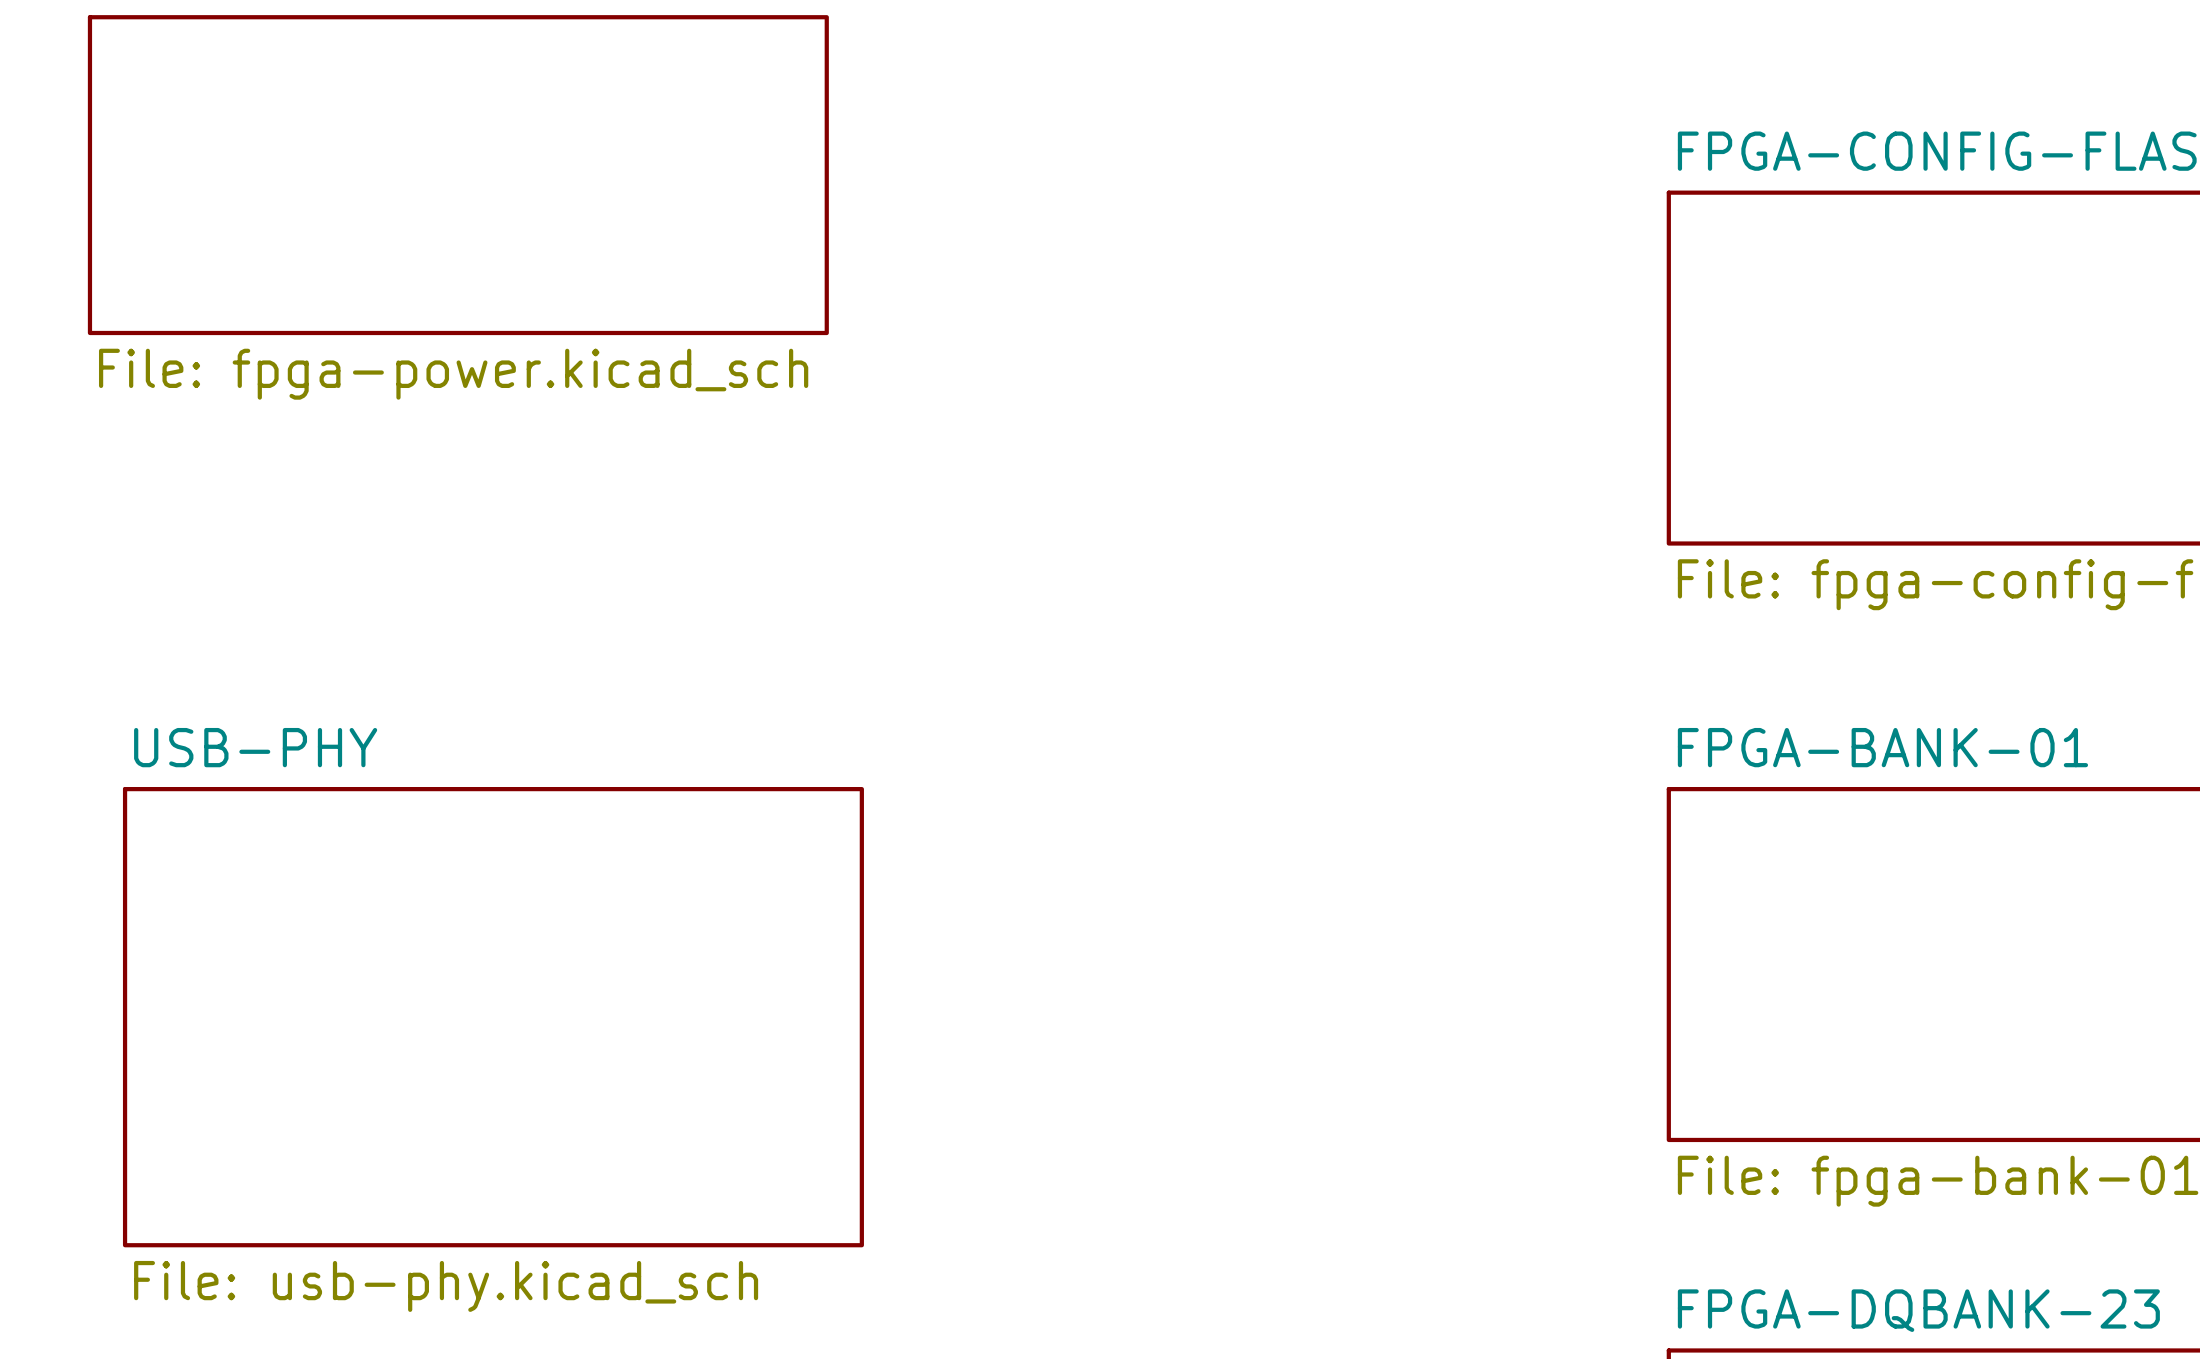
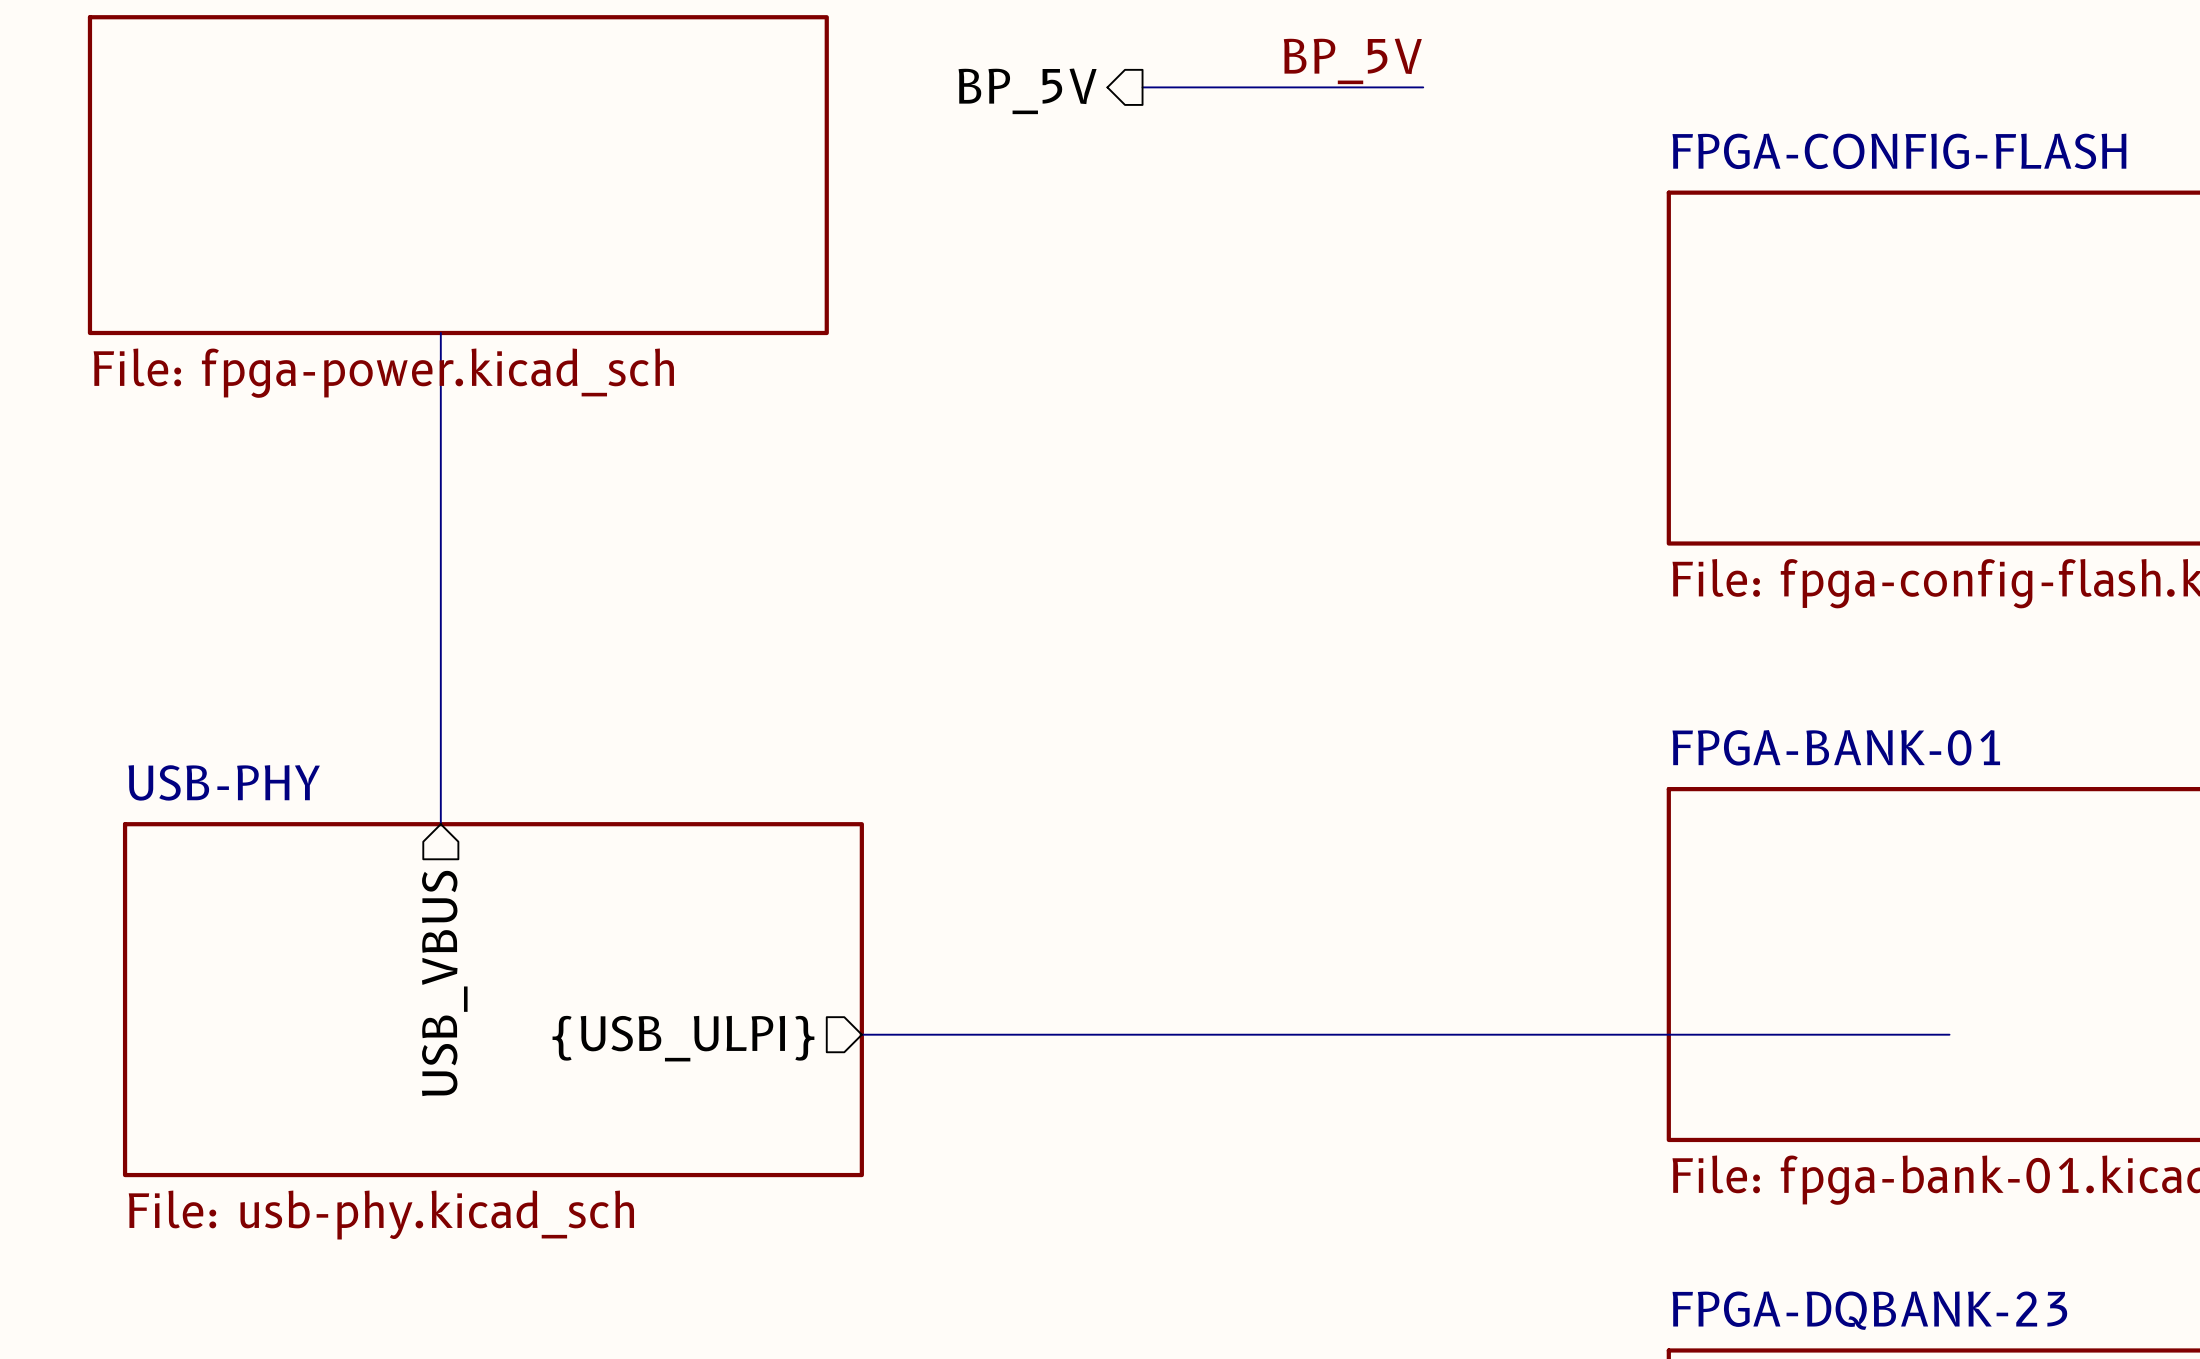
label: none -> BP_5V (1352, 61)
sheet pin: none -> BP_5V (1027, 91)
wire: none -> (1142, 87) (1423, 87)
wire: none -> (440, 332) (440, 824)
sheet USB-PHY shape: [122, 787, 864, 1248] -> [122, 822, 864, 1178]
sheet pin: none -> USB_VBUS (444, 983)
bus: none -> (861, 1034) (1949, 1034)
sheet pin: none -> {USB_ULPI} (683, 1038)

